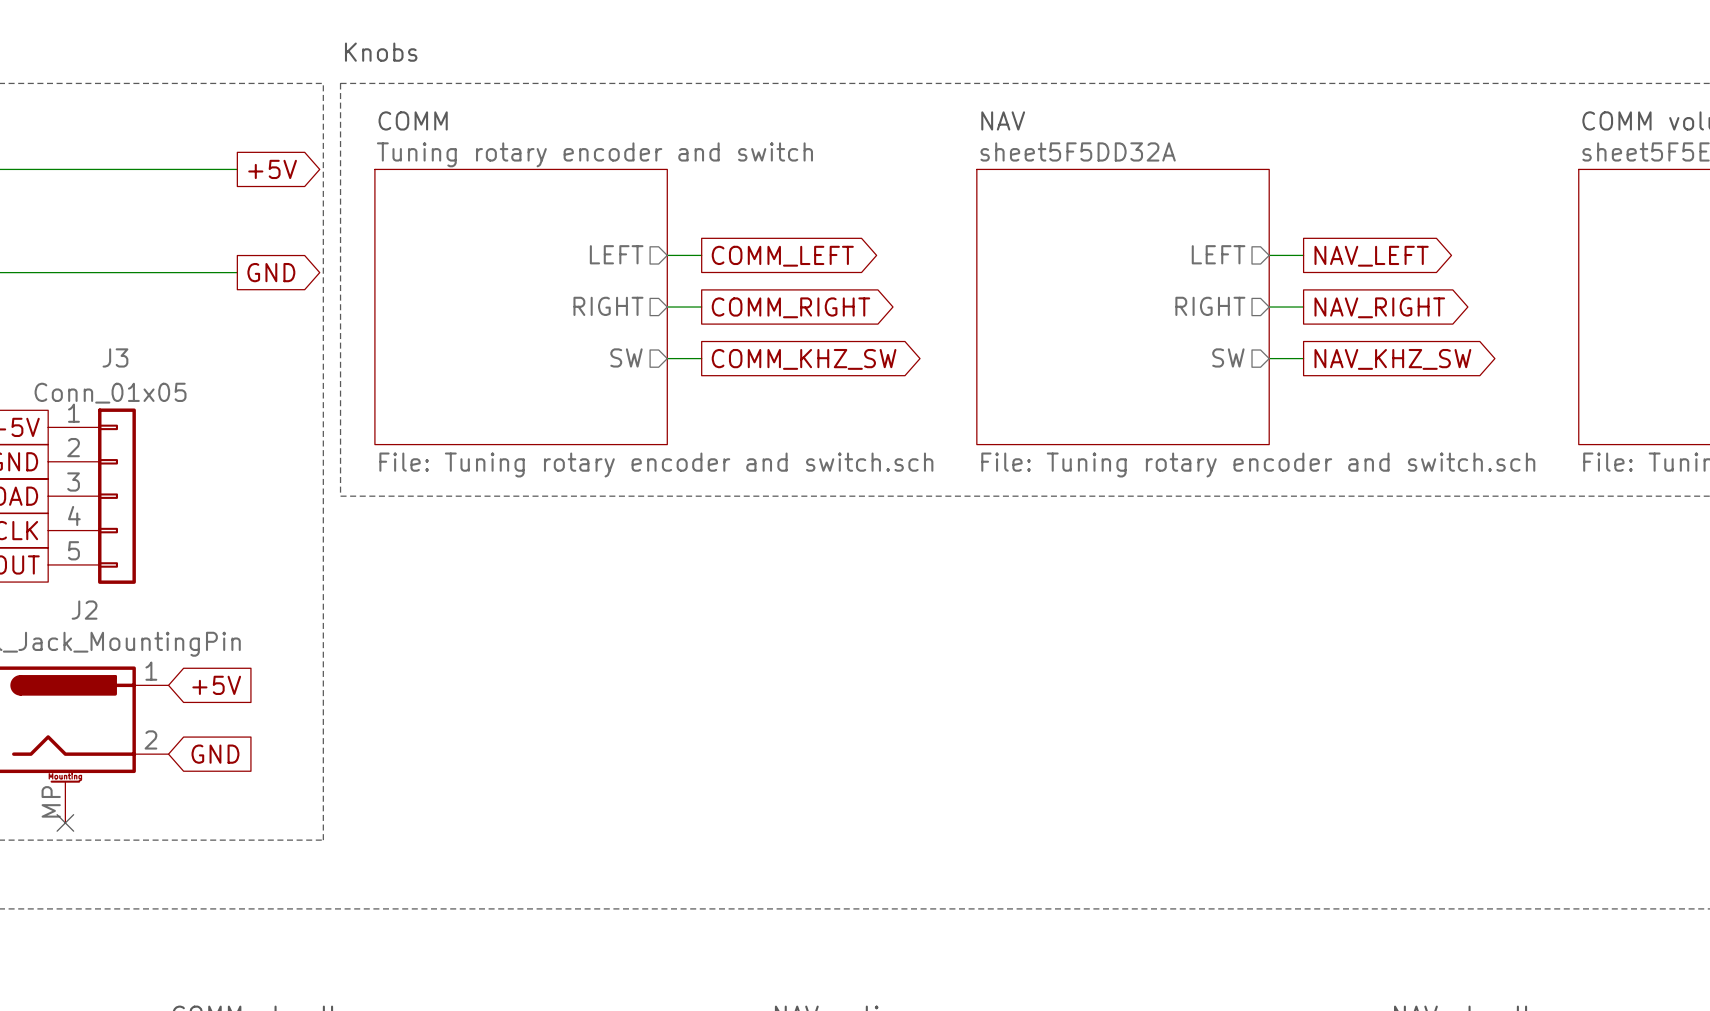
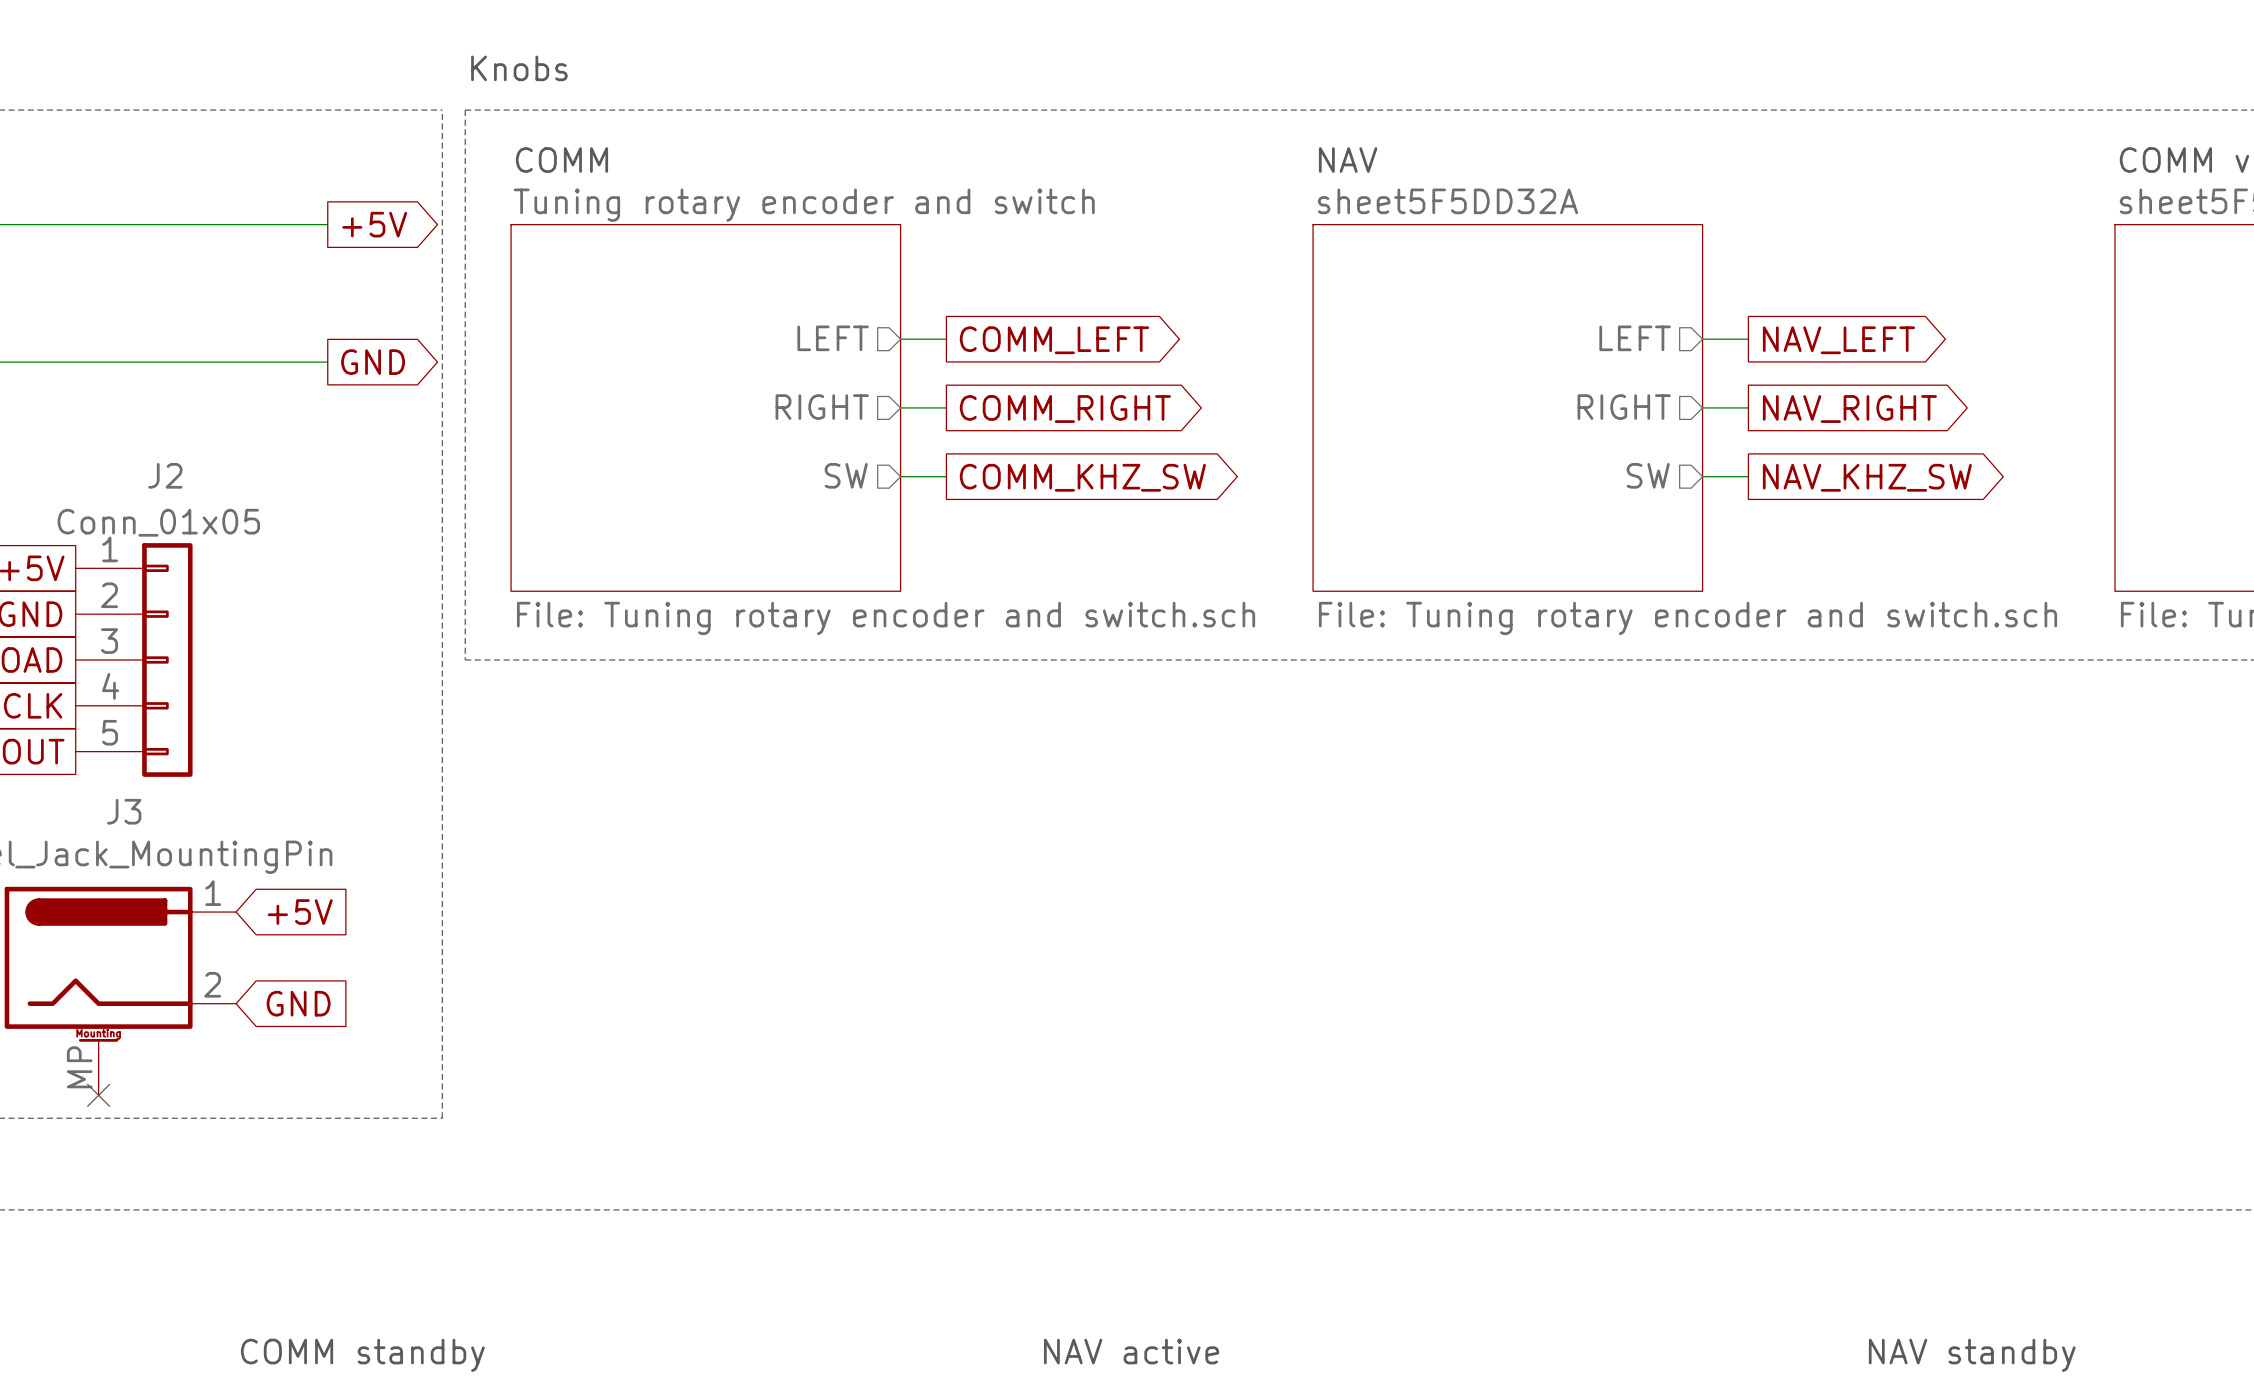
J3 name: J3 (115, 357) -> J2 (165, 475)
J2 name: J2 (84, 610) -> J3 (124, 811)

